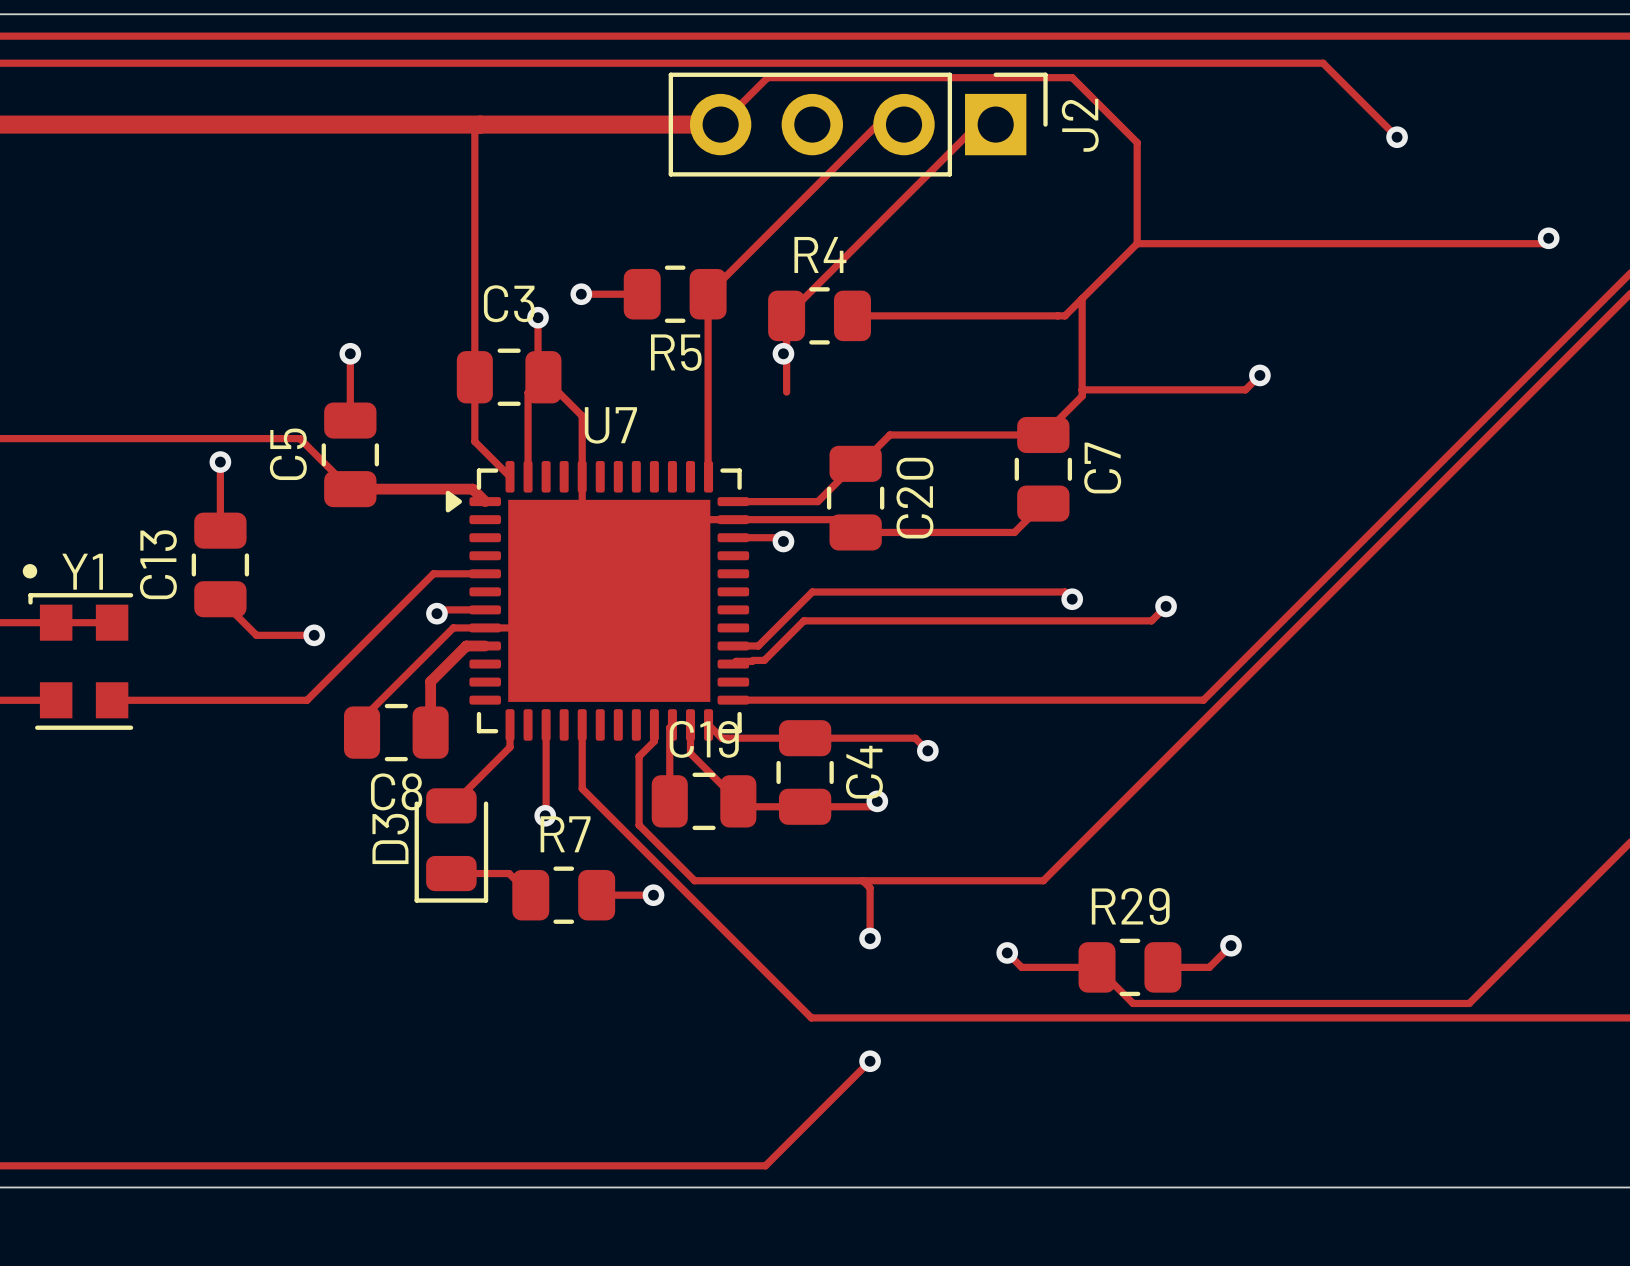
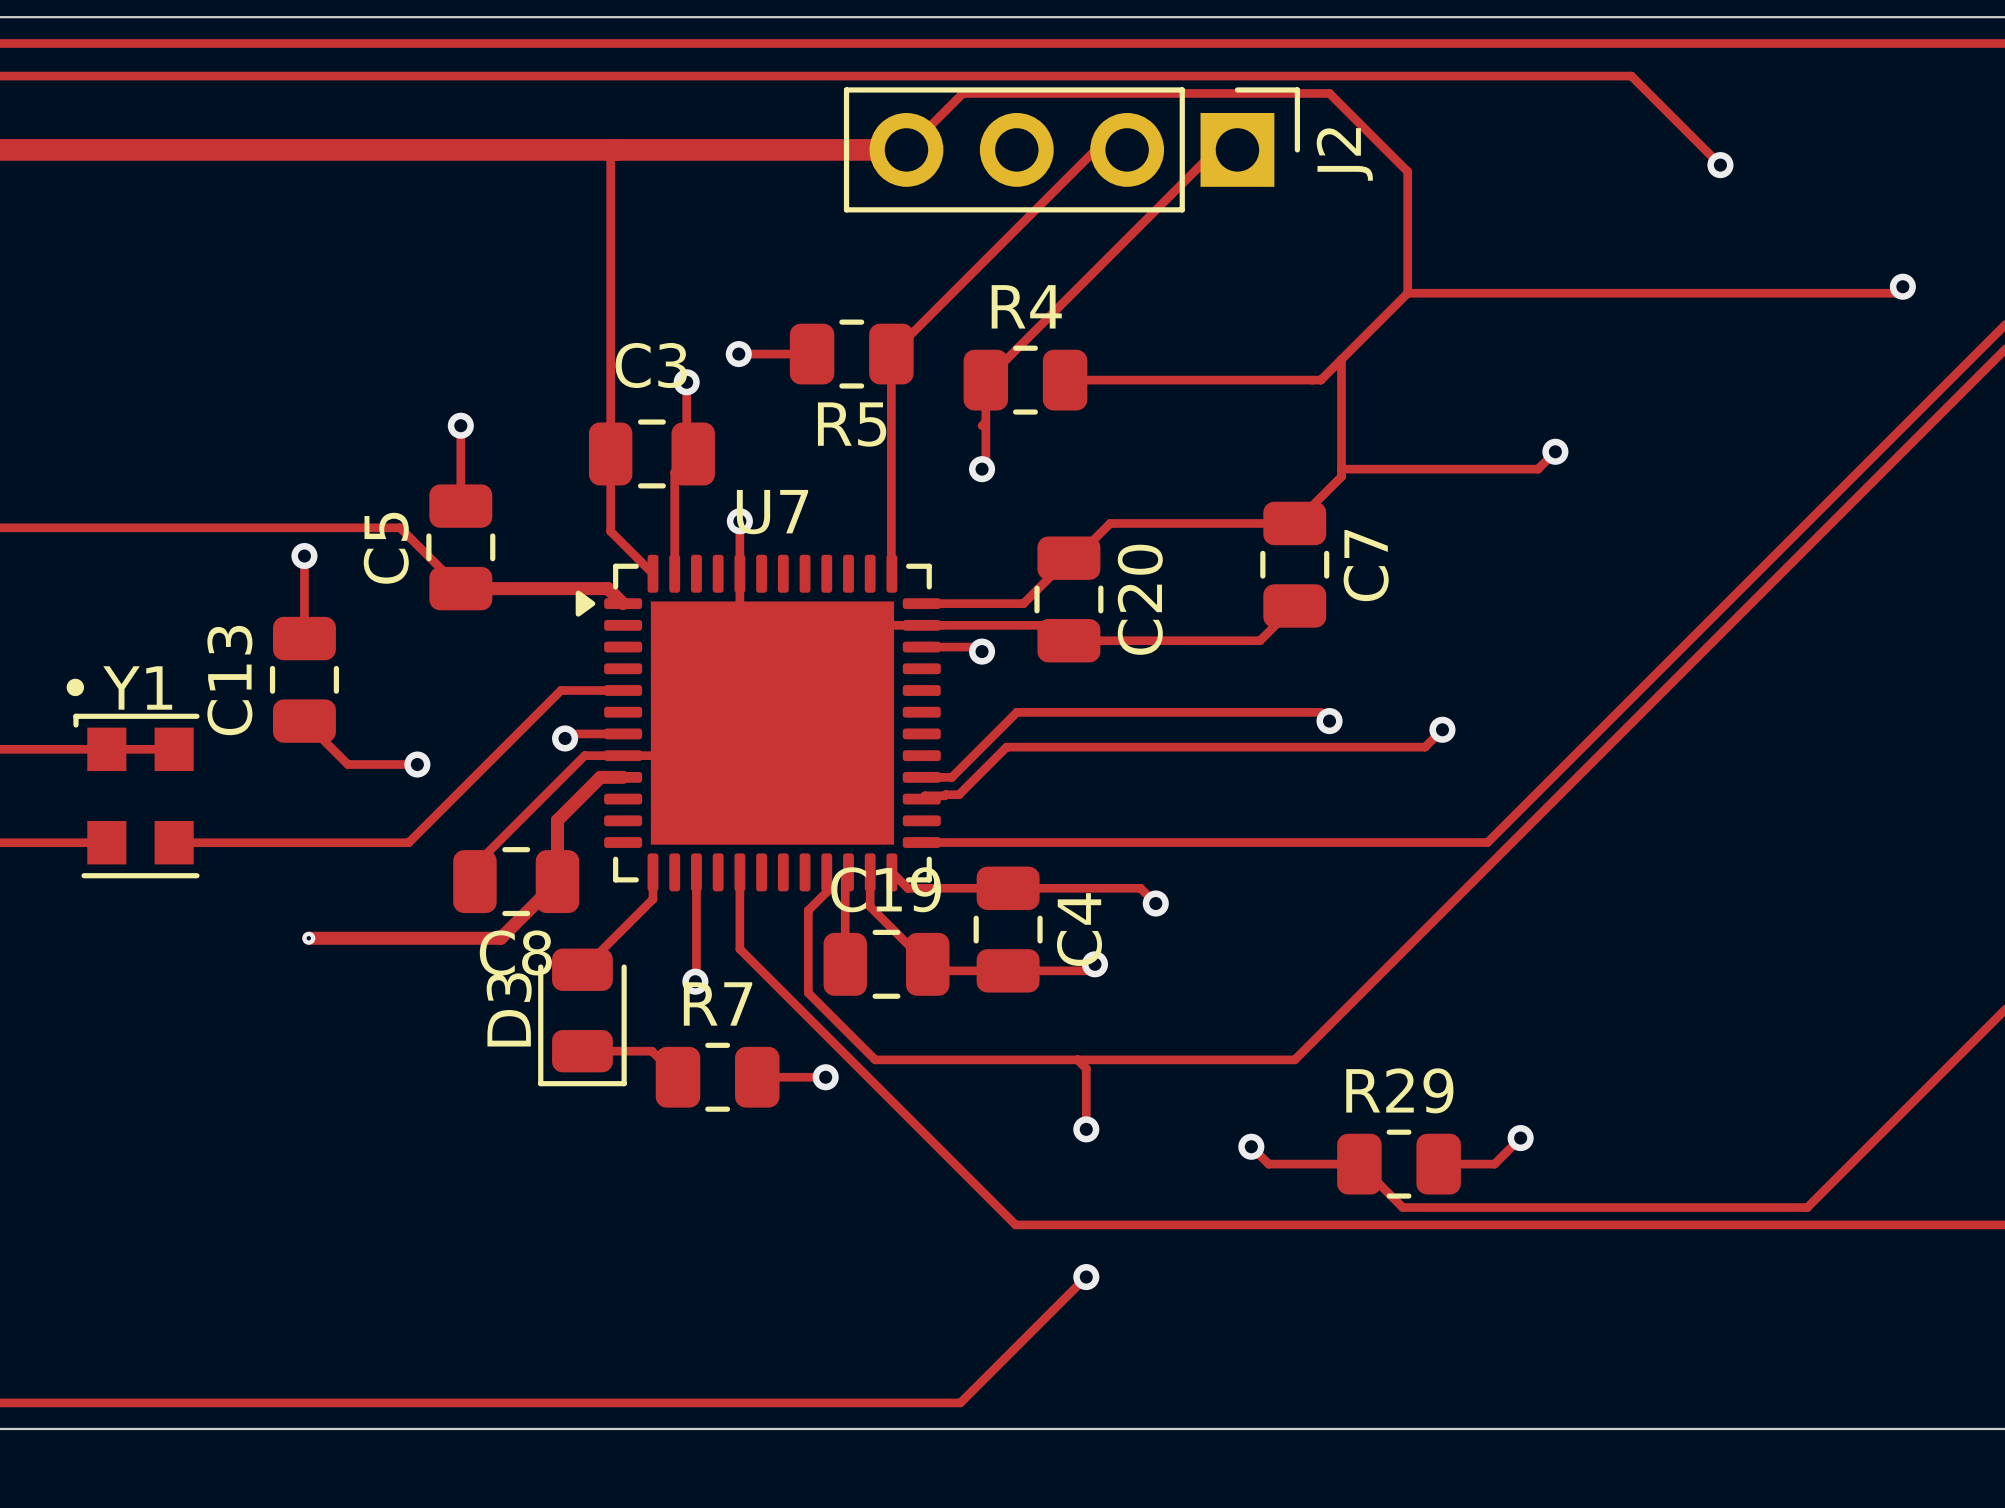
via position: (783, 353) -> (982, 469)
track: (543, 377) (582, 416) (582, 433) -> none
via: none -> (739, 521)
track: none -> (557, 881) (500, 938) (308, 938)
via: none -> (308, 938)

